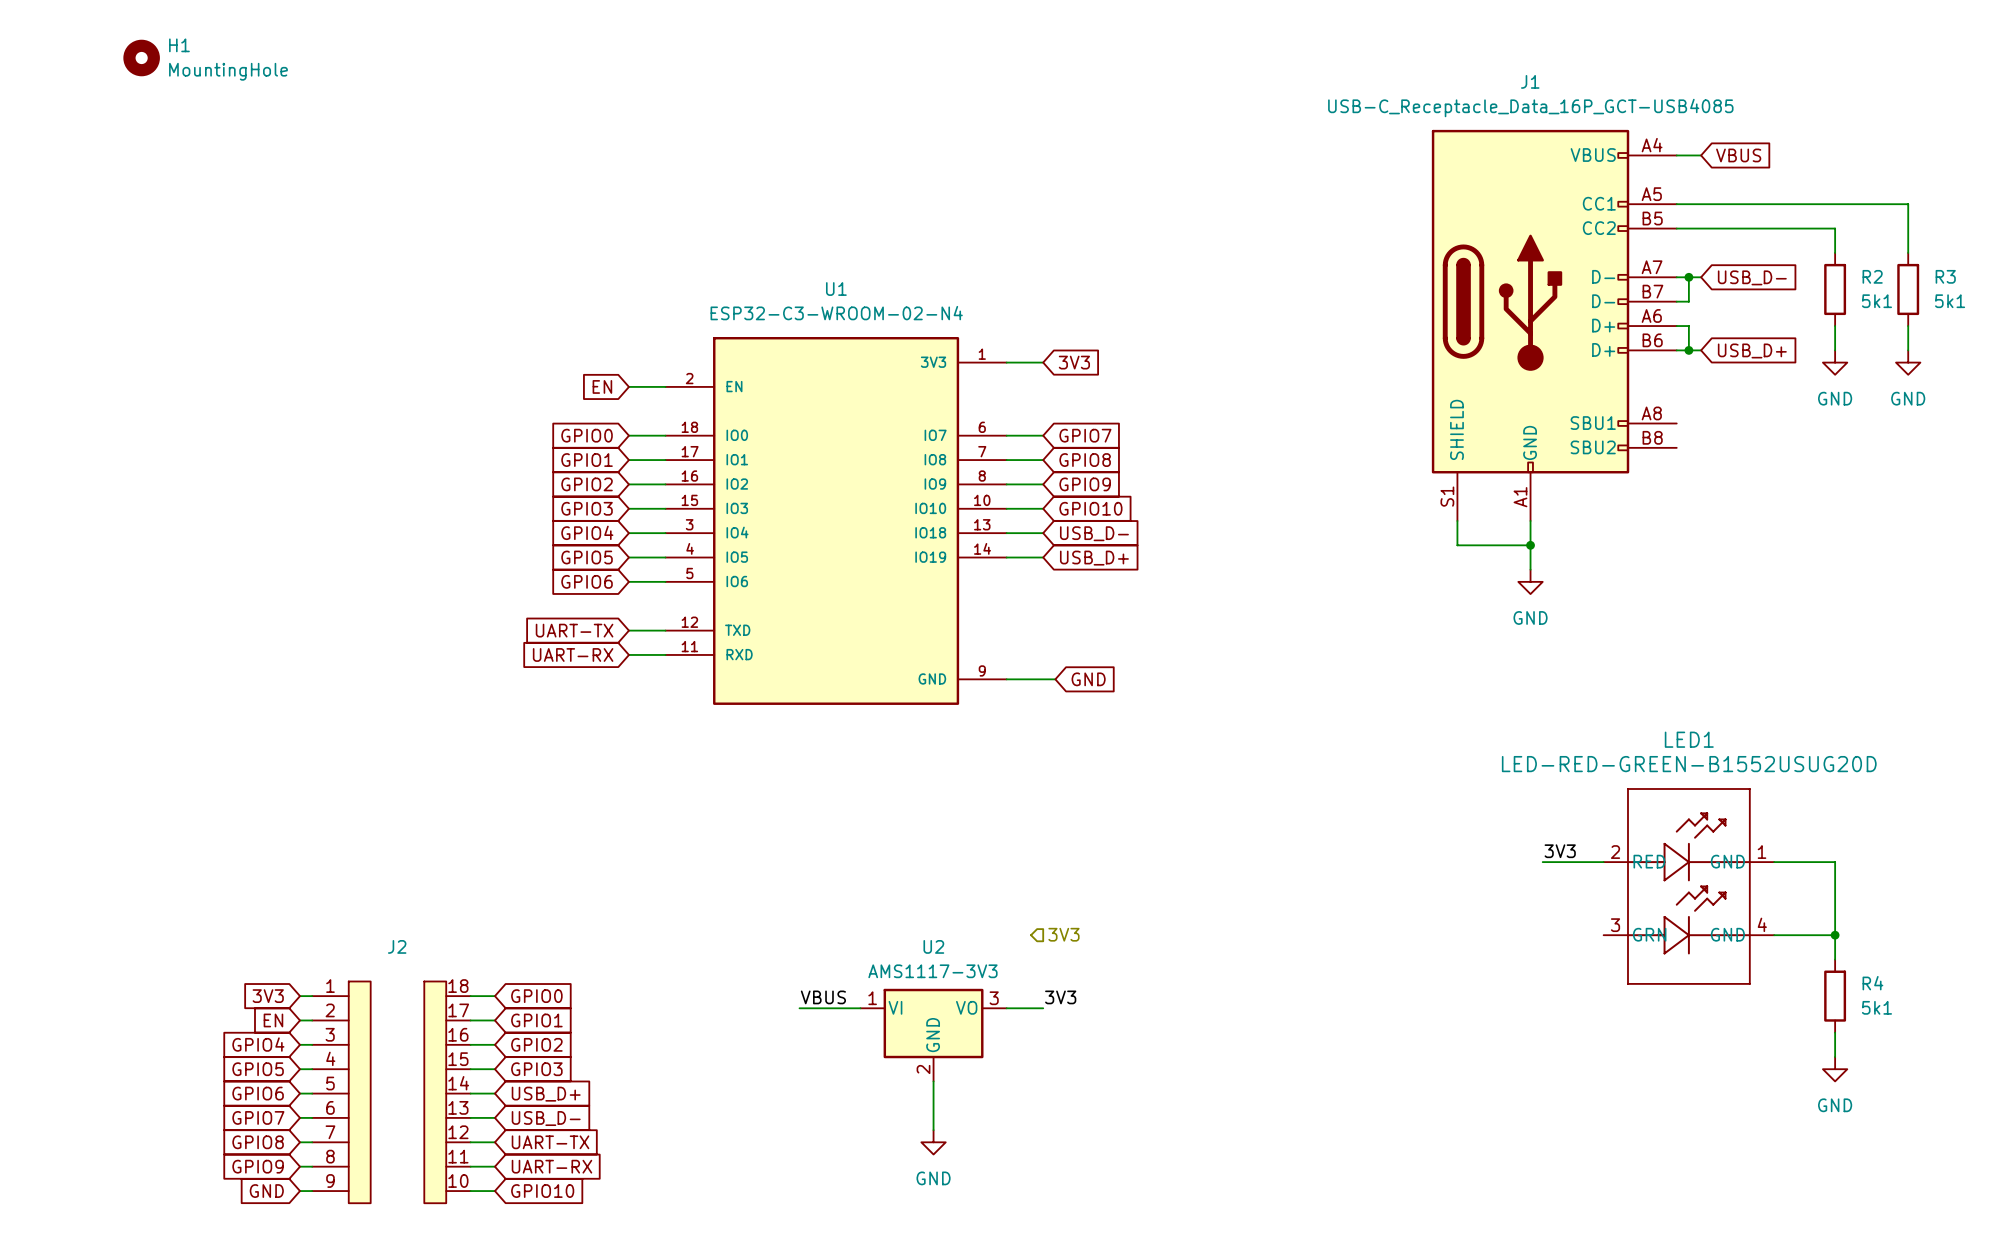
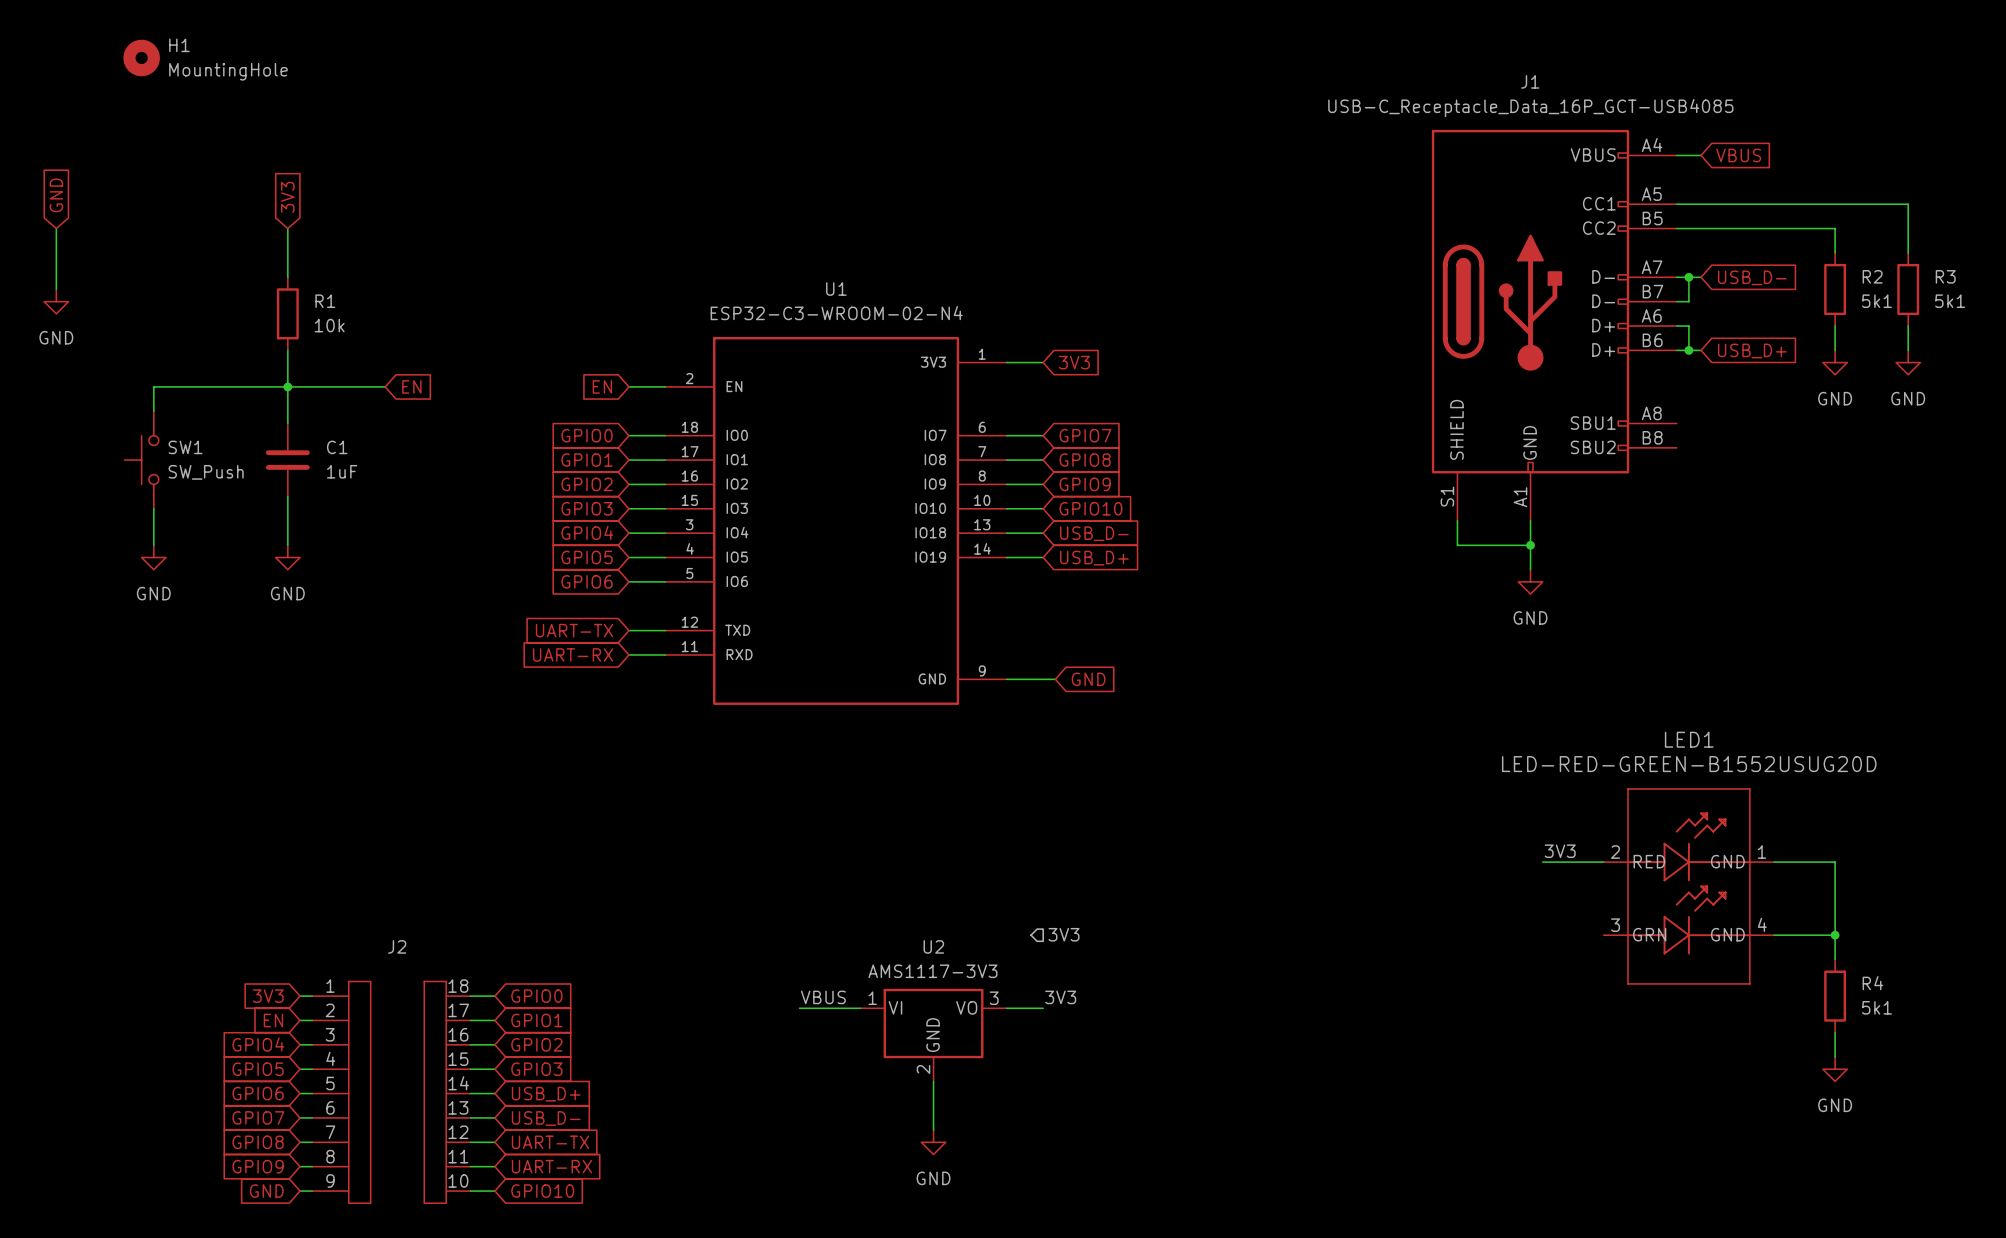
global label: none -> GND (56, 195)
global label: none -> 3V3 (287, 197)
wire: none -> (56, 228) (56, 289)
wire: none -> (287, 228) (287, 277)
power symbol: none -> GND (56, 301)
R1: none -> 10k (287, 313)
wire: none -> (287, 350) (287, 423)
junction: none -> (287, 386)
wire: none -> (385, 386) (153, 386) (153, 411)
global label: none -> EN (411, 386)
SW1: none -> SW_Push (141, 460)
C1: none -> 1uF (287, 460)
wire: none -> (287, 496) (287, 545)
wire: none -> (153, 508) (153, 545)
power symbol: none -> GND (153, 557)
power symbol: none -> GND (287, 557)

